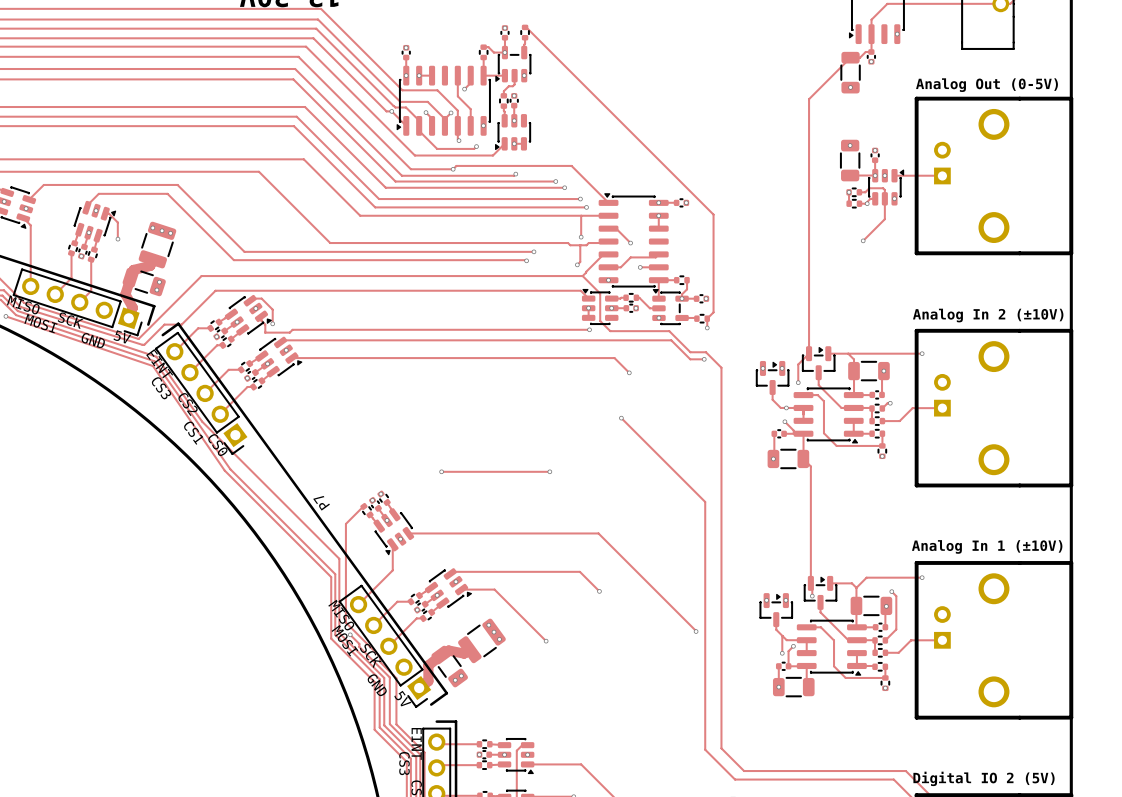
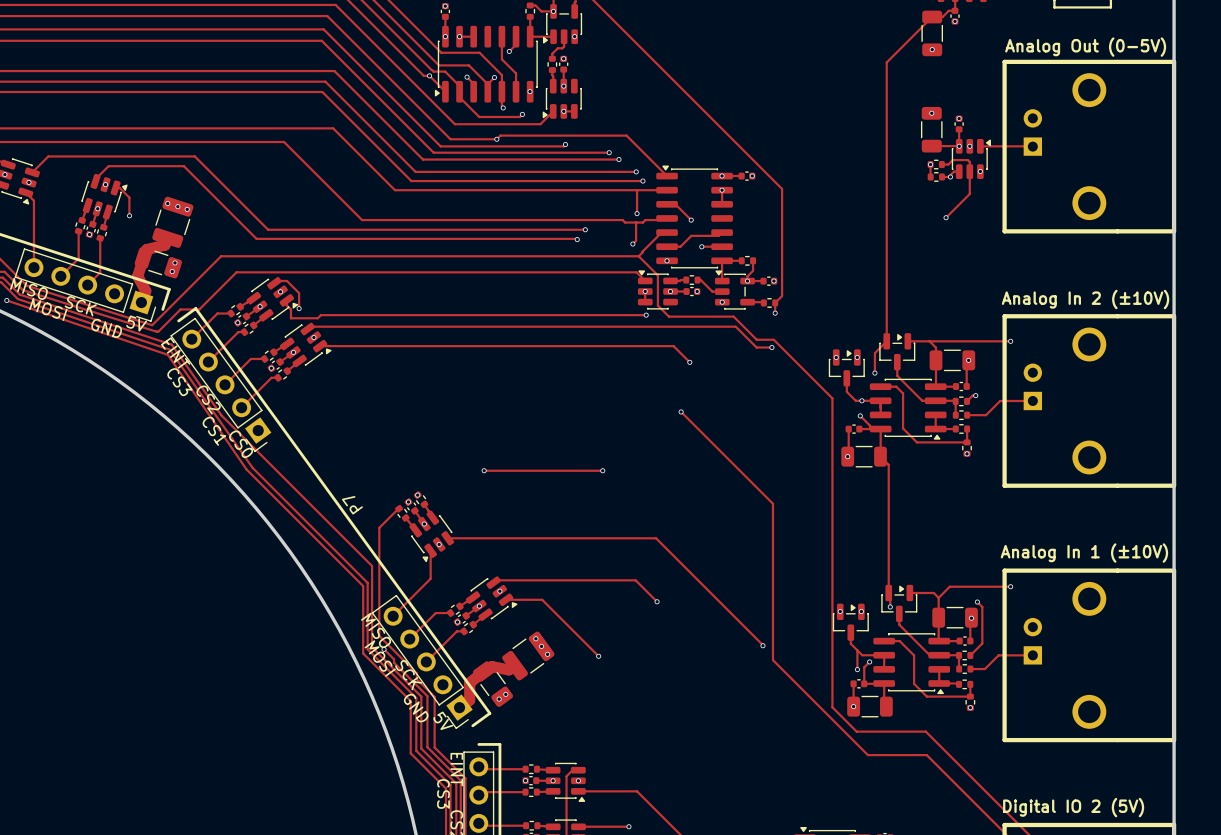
track: (721, 367) (721, 748) (744, 771) (905, 771) -> (790, 356) (832, 398) (832, 707) (856, 731) (925, 731) (992, 798)
track: (705, 644) (705, 749) (735, 779) (893, 779) -> (772, 660) (867, 755) (926, 755) (979, 807)

